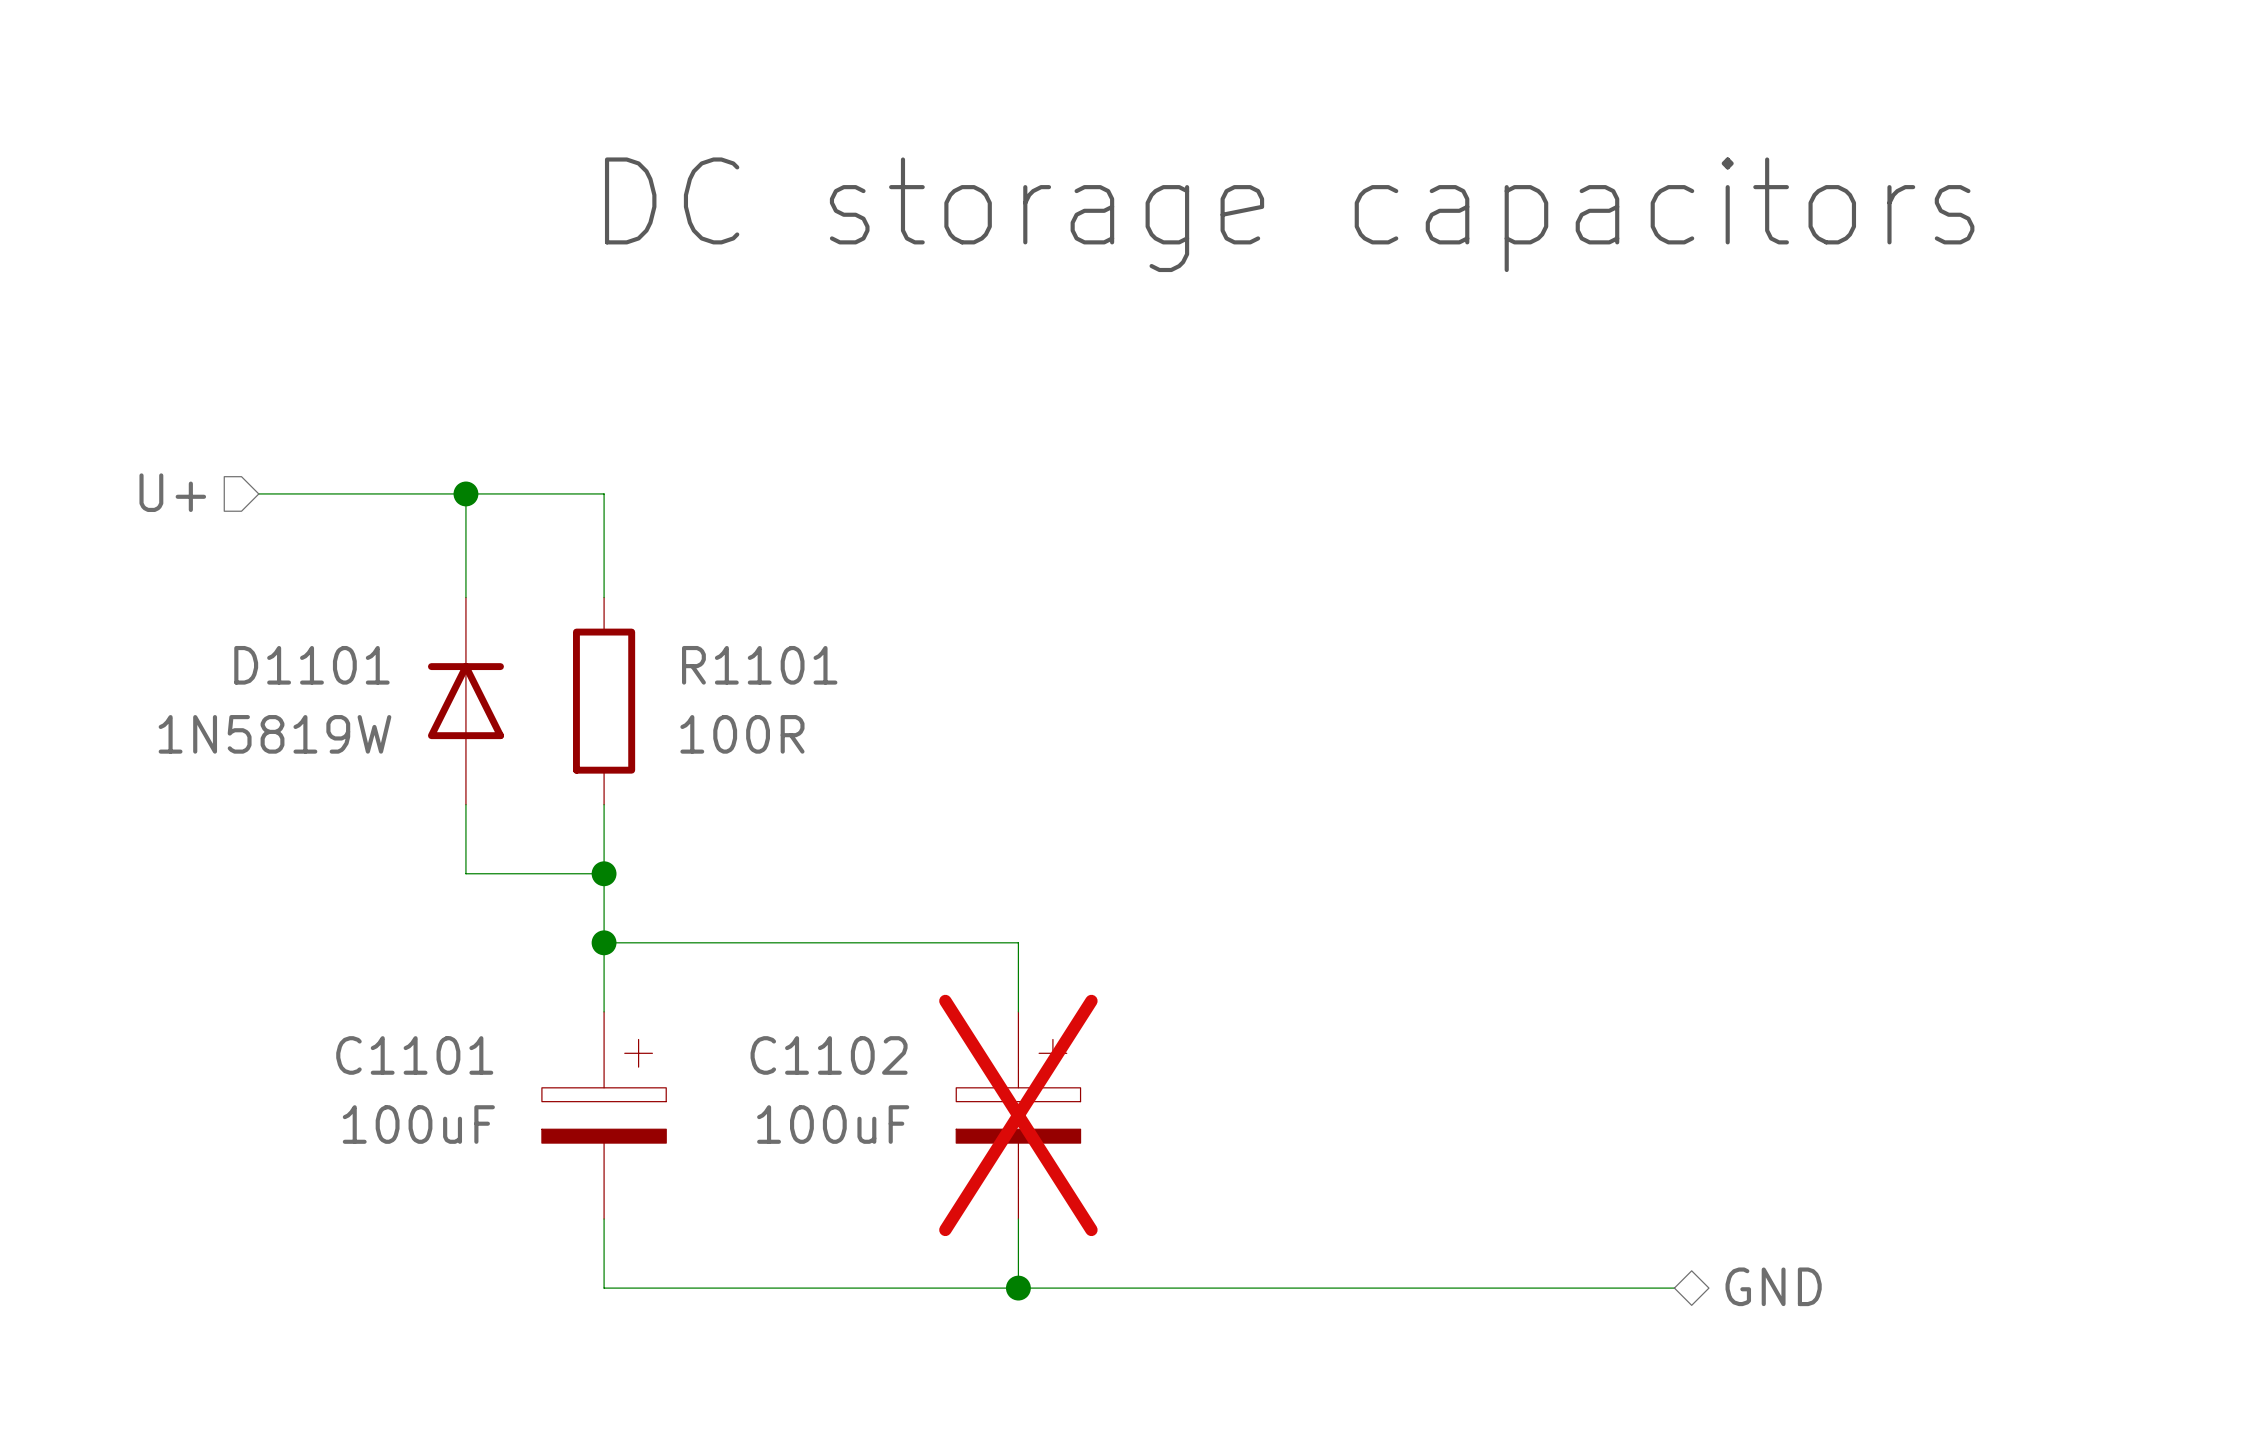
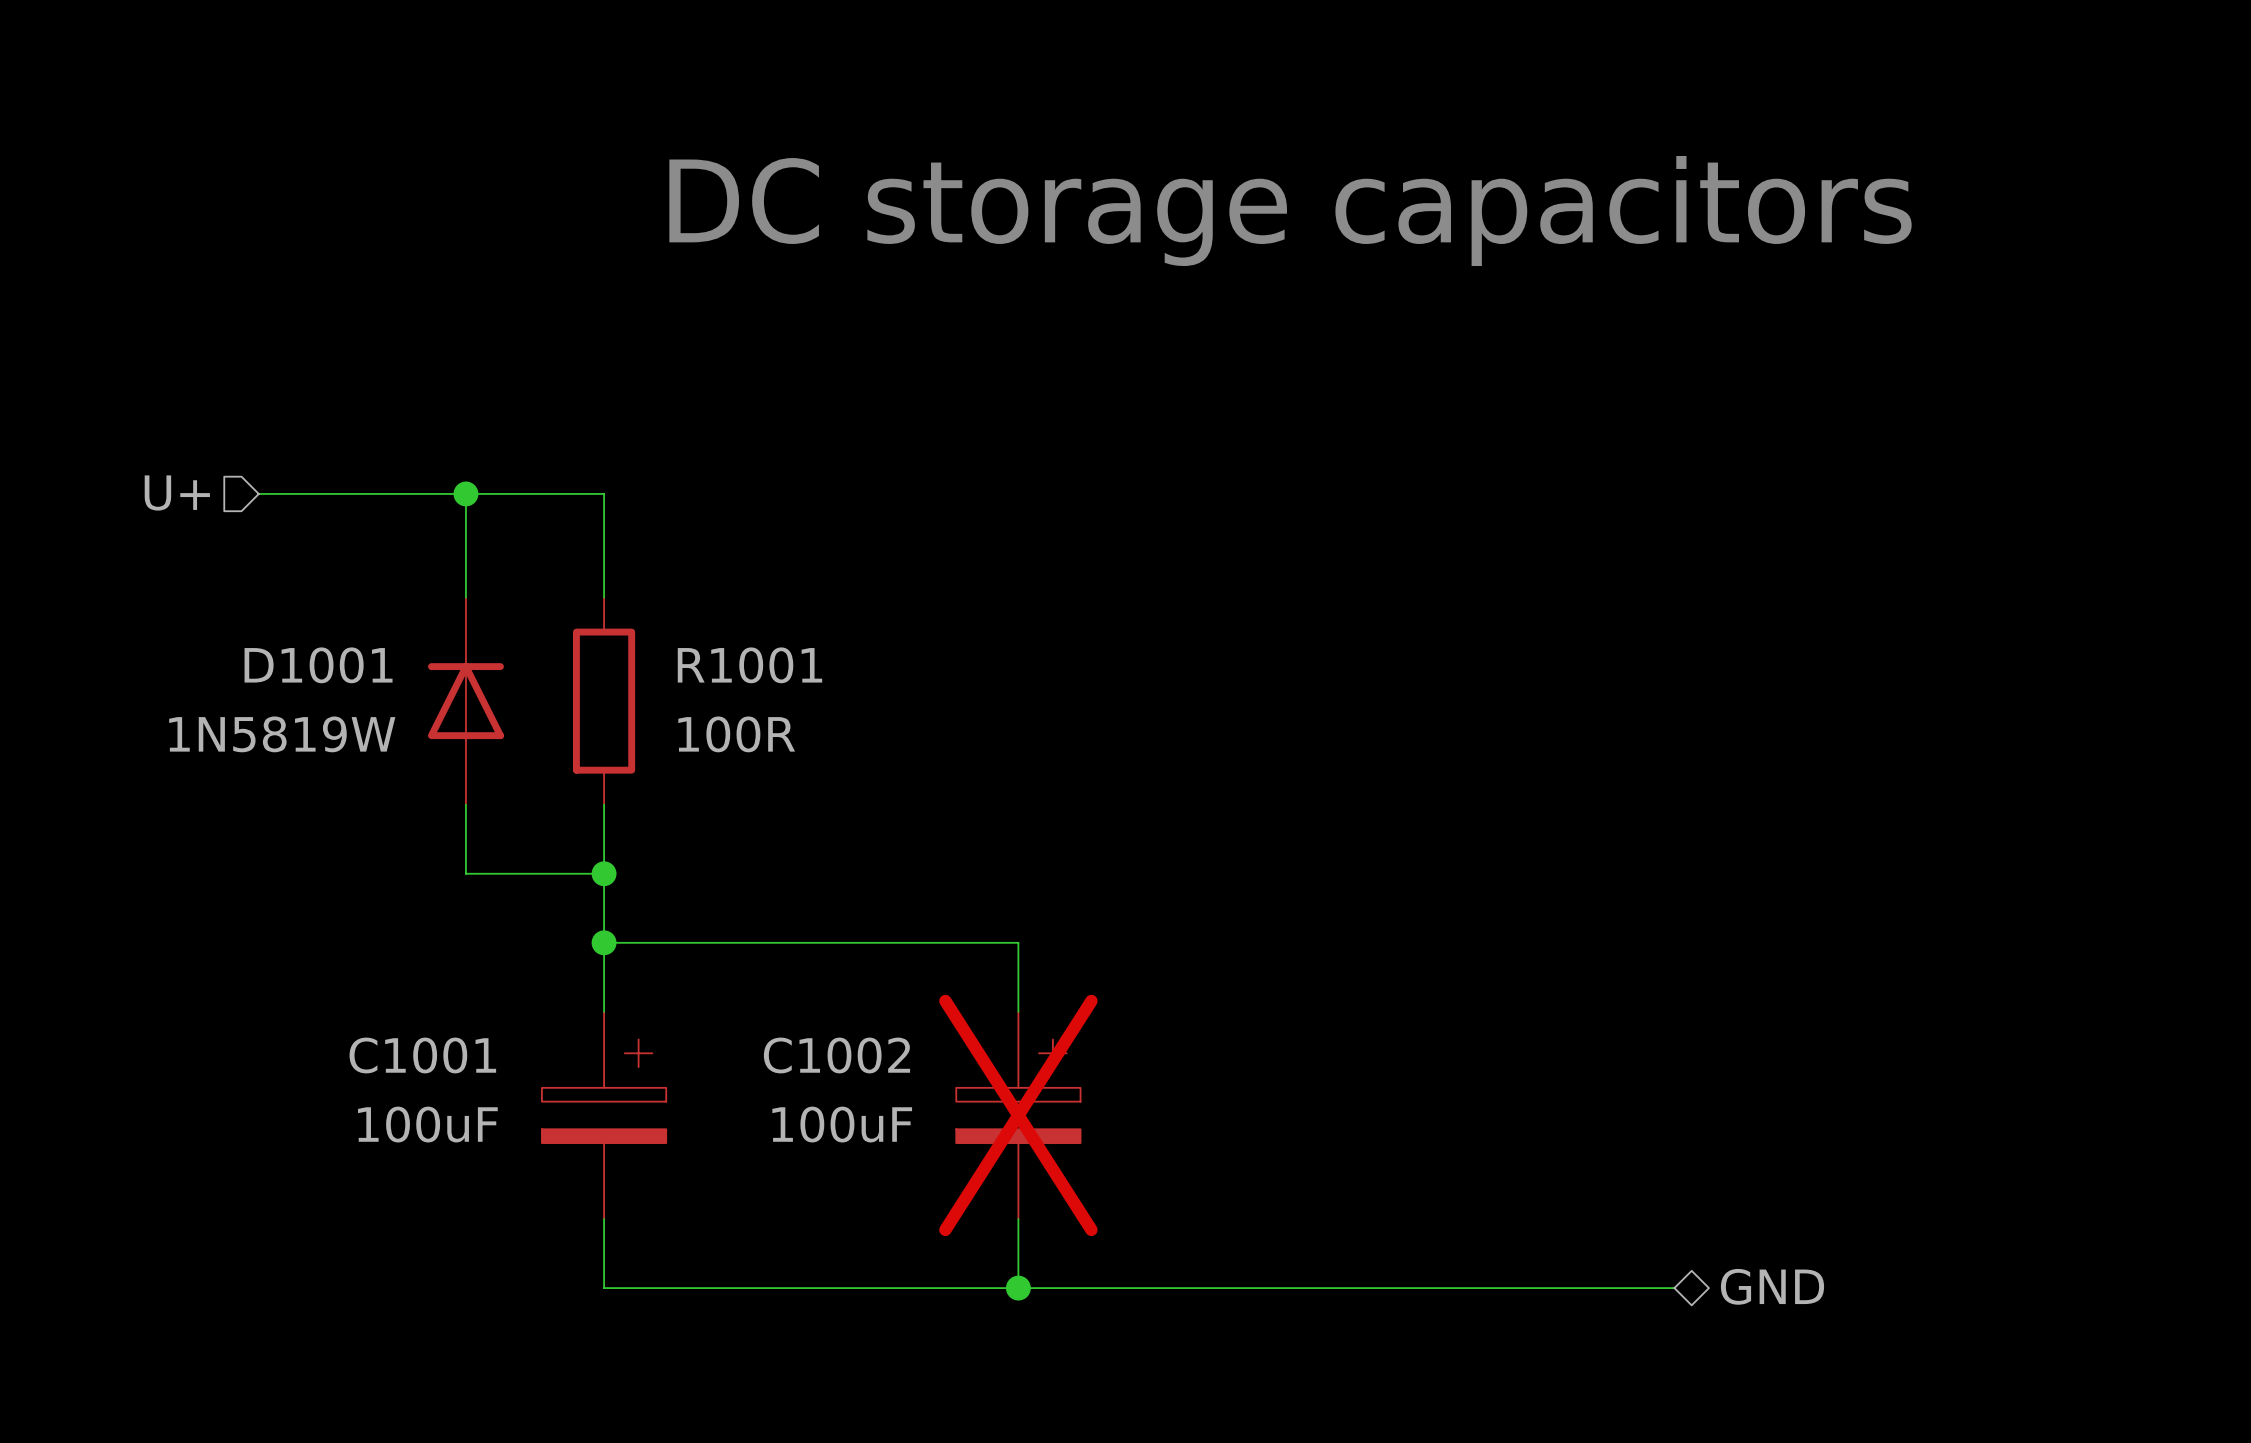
D1101 name: D1101 (311, 665) -> D1001 (318, 665)
R1101 name: R1101 (759, 665) -> R1001 (749, 665)
C1101 name: C1101 (414, 1055) -> C1001 (422, 1055)
C1102 name: C1102 (829, 1055) -> C1002 (836, 1055)

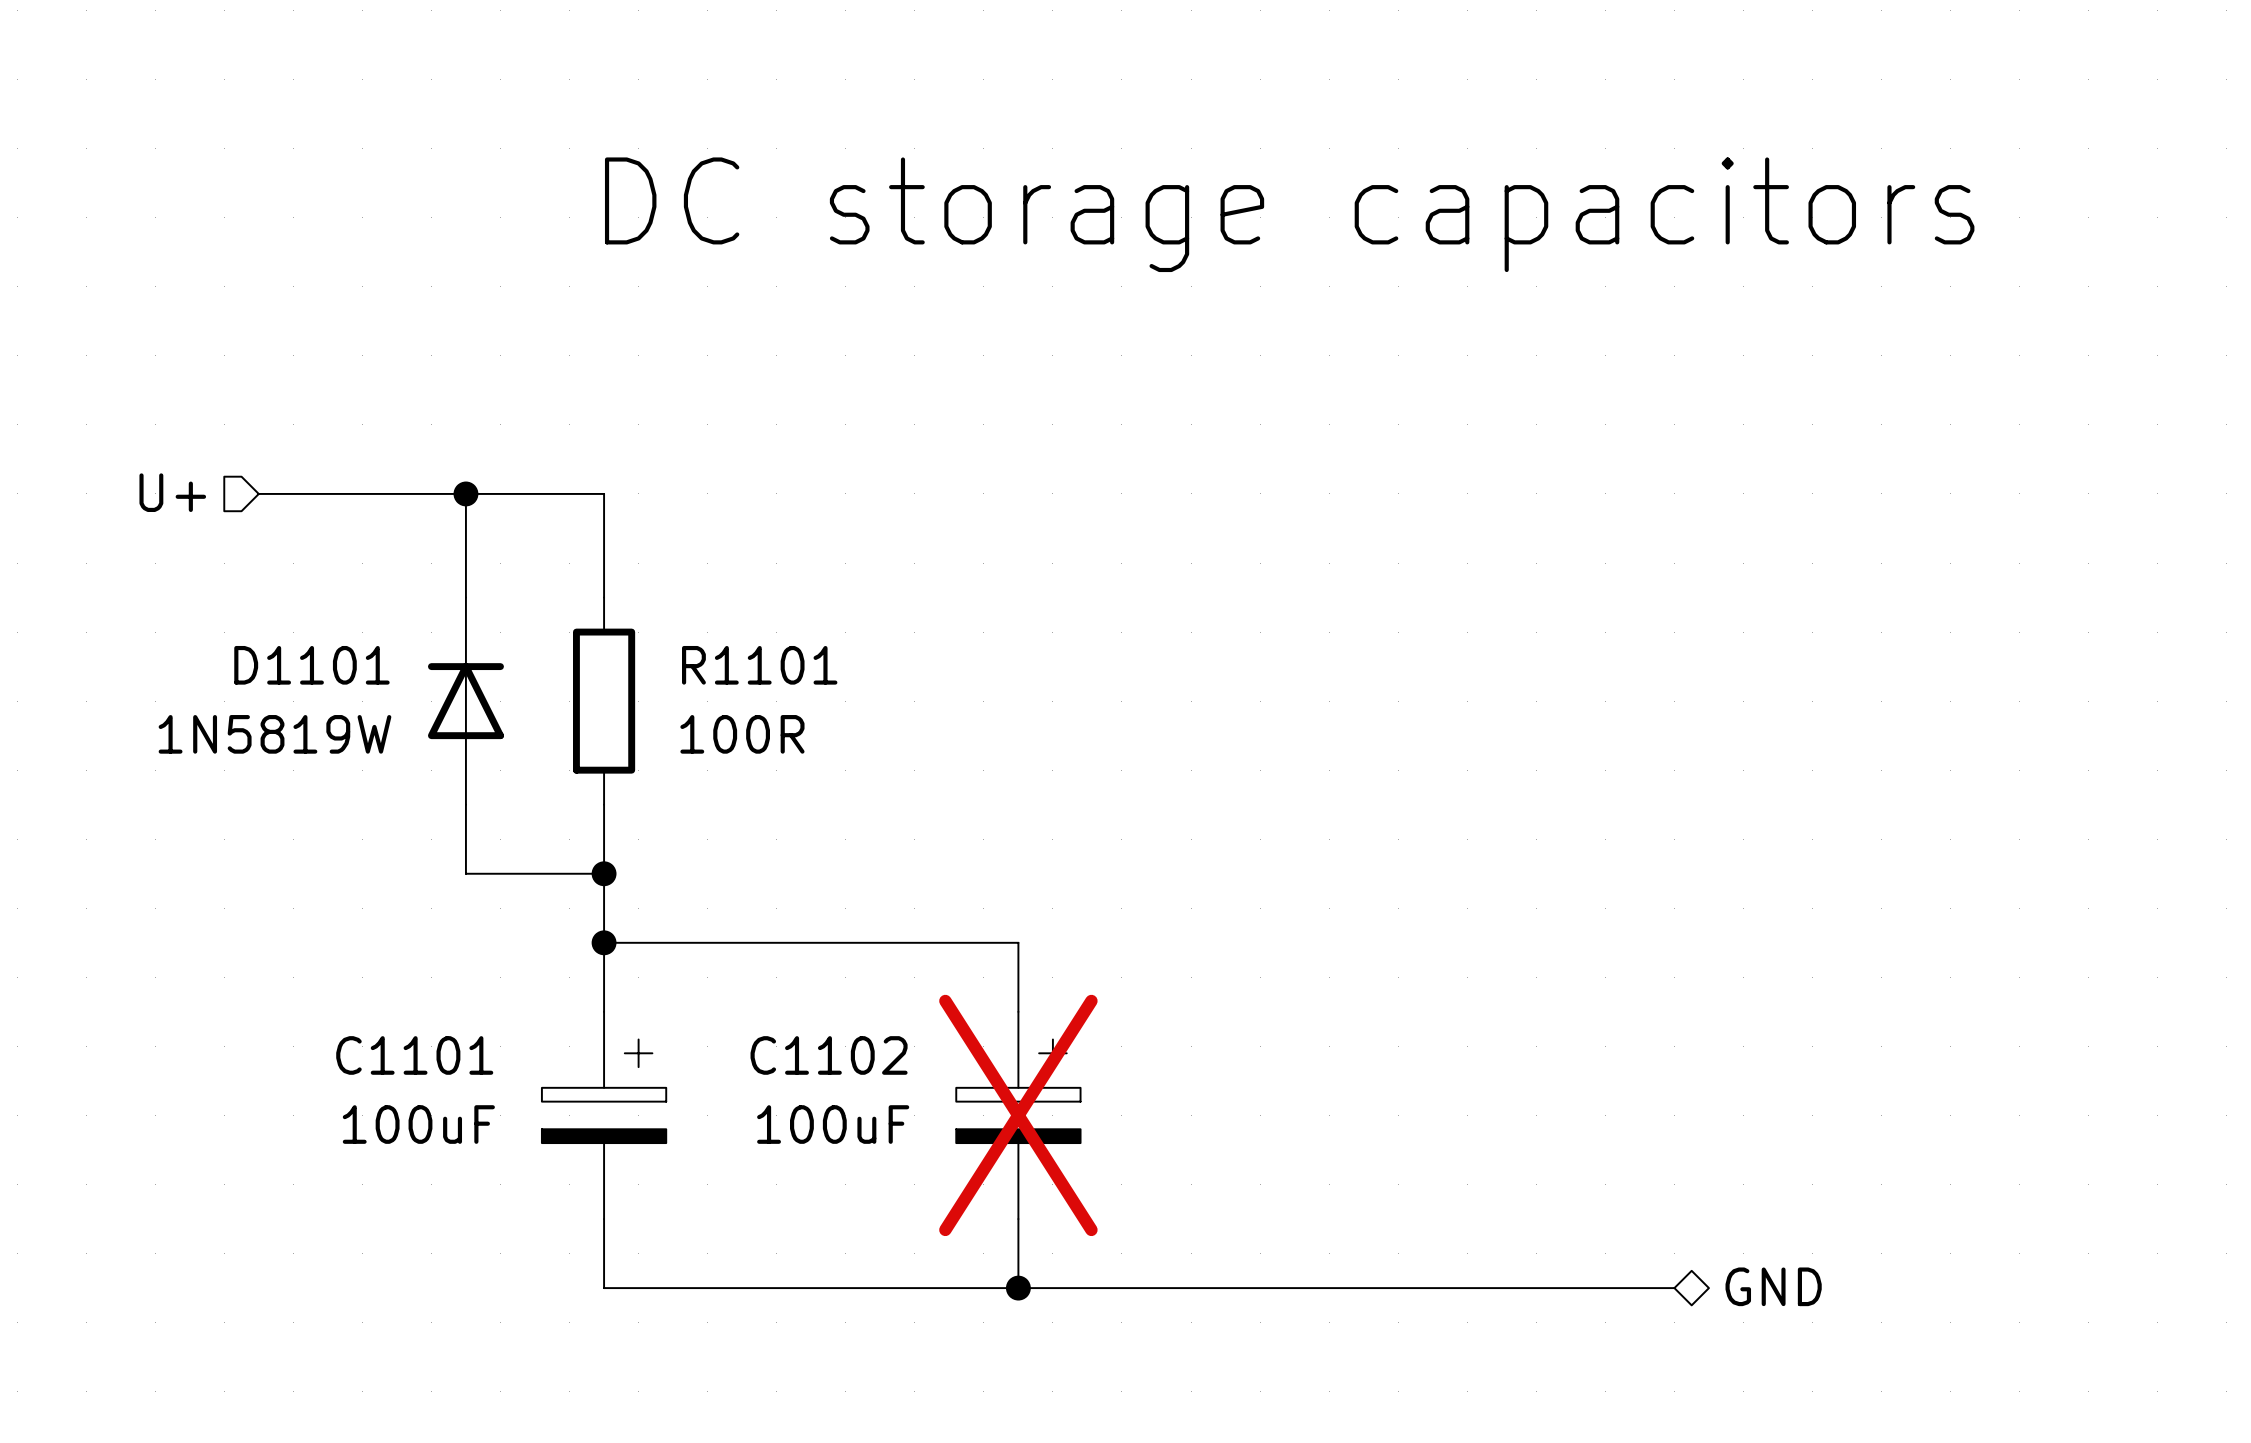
D1001 name: D1001 (318, 665) -> D1101 (311, 665)
R1001 name: R1001 (749, 665) -> R1101 (759, 665)
C1001 name: C1001 (422, 1055) -> C1101 (414, 1055)
C1002 name: C1002 (836, 1055) -> C1102 (829, 1055)

